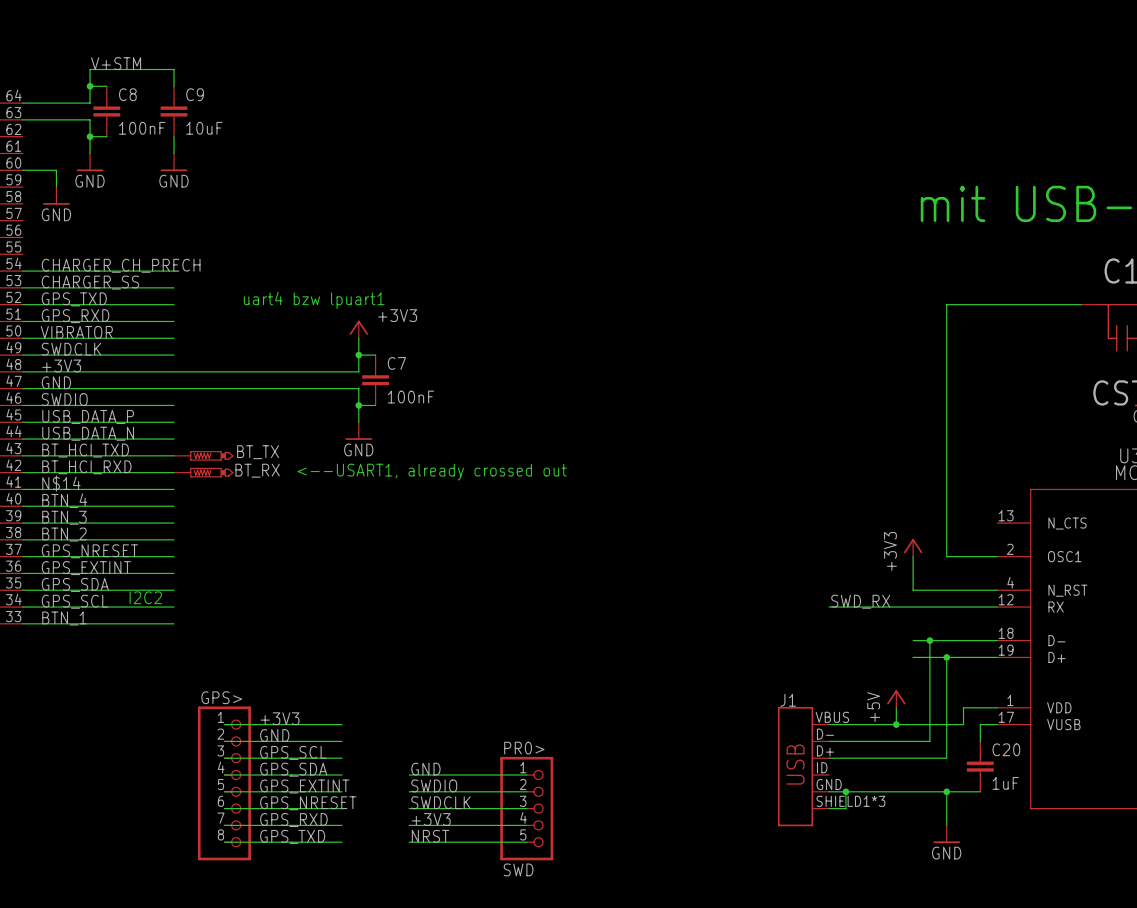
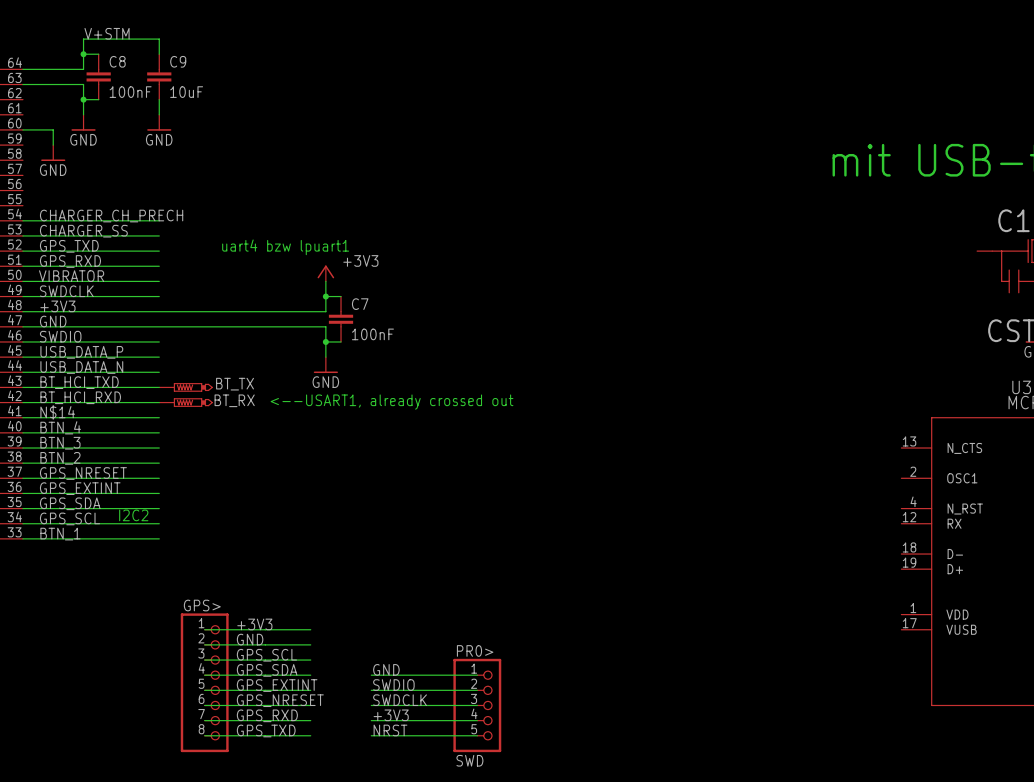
wire: (1081, 304) (946, 304) (946, 556) (997, 556) -> none
power symbol: +3V3 (913, 547) -> none
wire: (913, 556) (913, 590) (997, 590) -> none
label: SWD_RX (860, 601) -> none
wire: (829, 607) (997, 607) -> none
wire: (913, 640) (997, 640) -> none
wire: (929, 640) (929, 741) (829, 741) -> none
junction: (929, 640) -> none
wire: (913, 657) (997, 657) -> none
wire: (946, 657) (946, 758) (829, 758) -> none
junction: (946, 657) -> none
power symbol: +5V (896, 698) -> none
wire: (896, 707) (896, 724) -> none
wire: (997, 707) (963, 707) (963, 724) (829, 724) -> none
junction: (896, 724) -> none
wire: (997, 724) (980, 724) (980, 741) -> none
J1: (803, 766) -> none
C20: 1uF (980, 766) -> none
wire: (829, 791) (980, 791) -> none
wire: (845, 791) (845, 808) (829, 808) -> none
junction: (845, 791) -> none
wire: (946, 791) (946, 825) -> none
junction: (946, 791) -> none
power symbol: GND (946, 834) -> none

